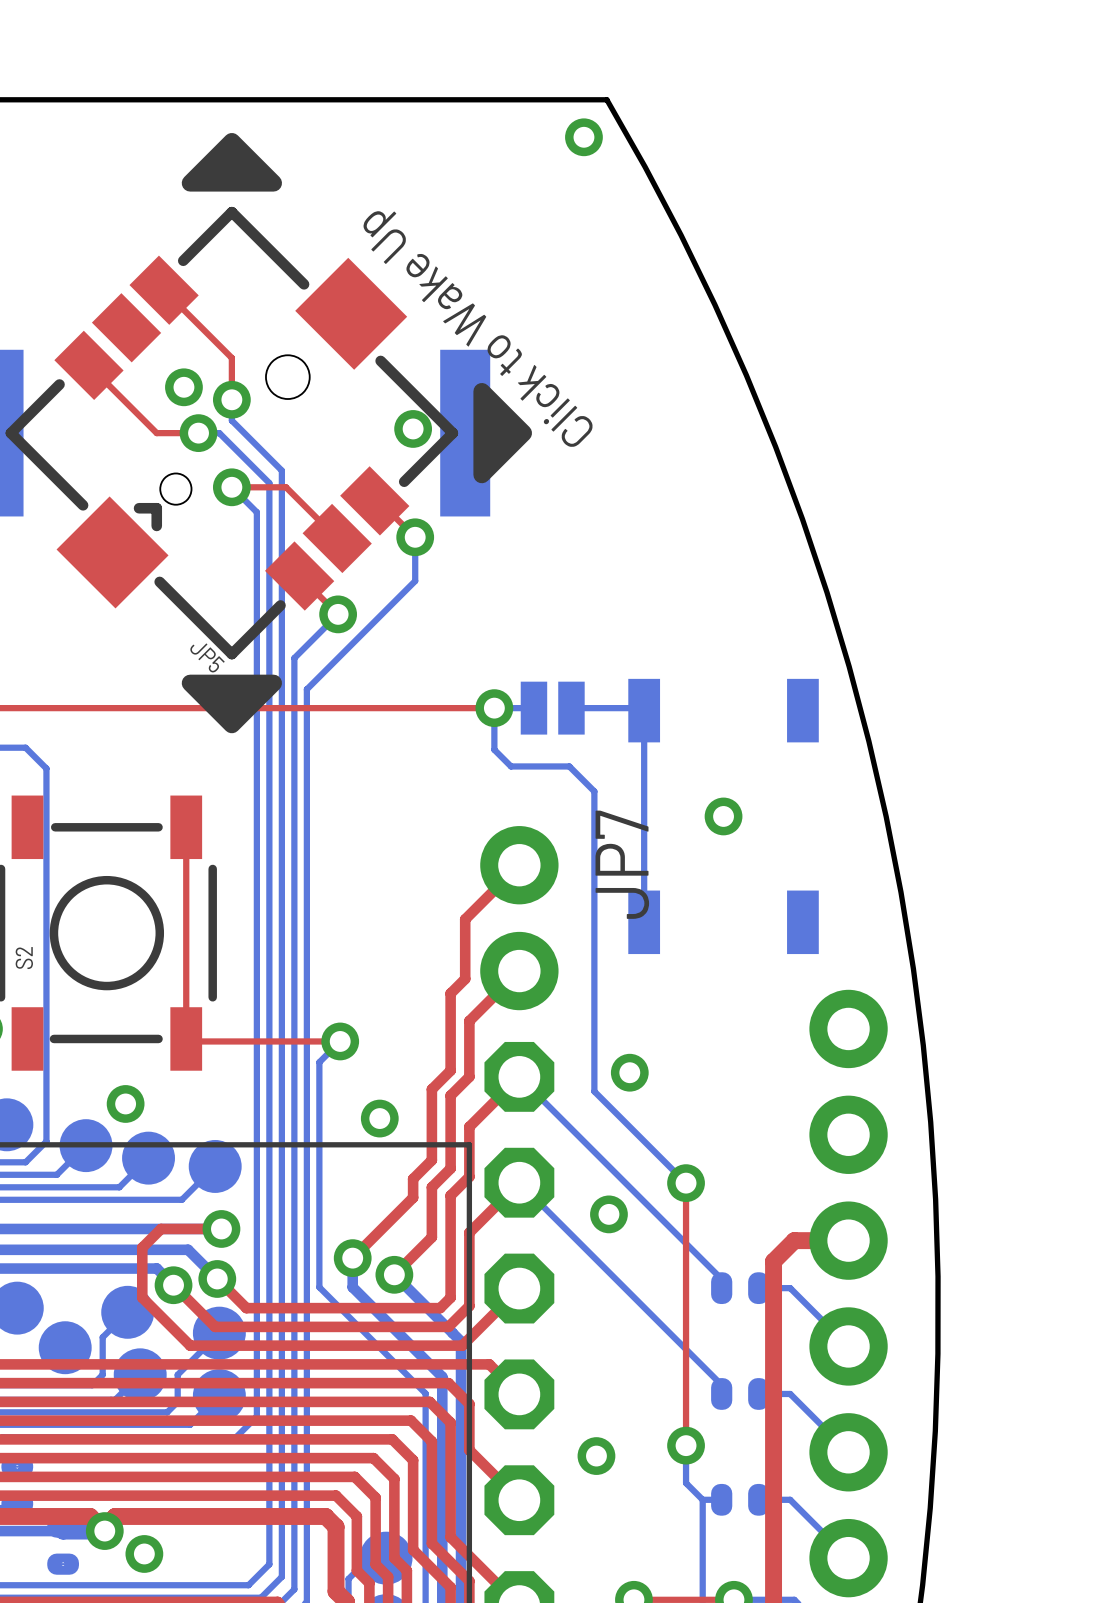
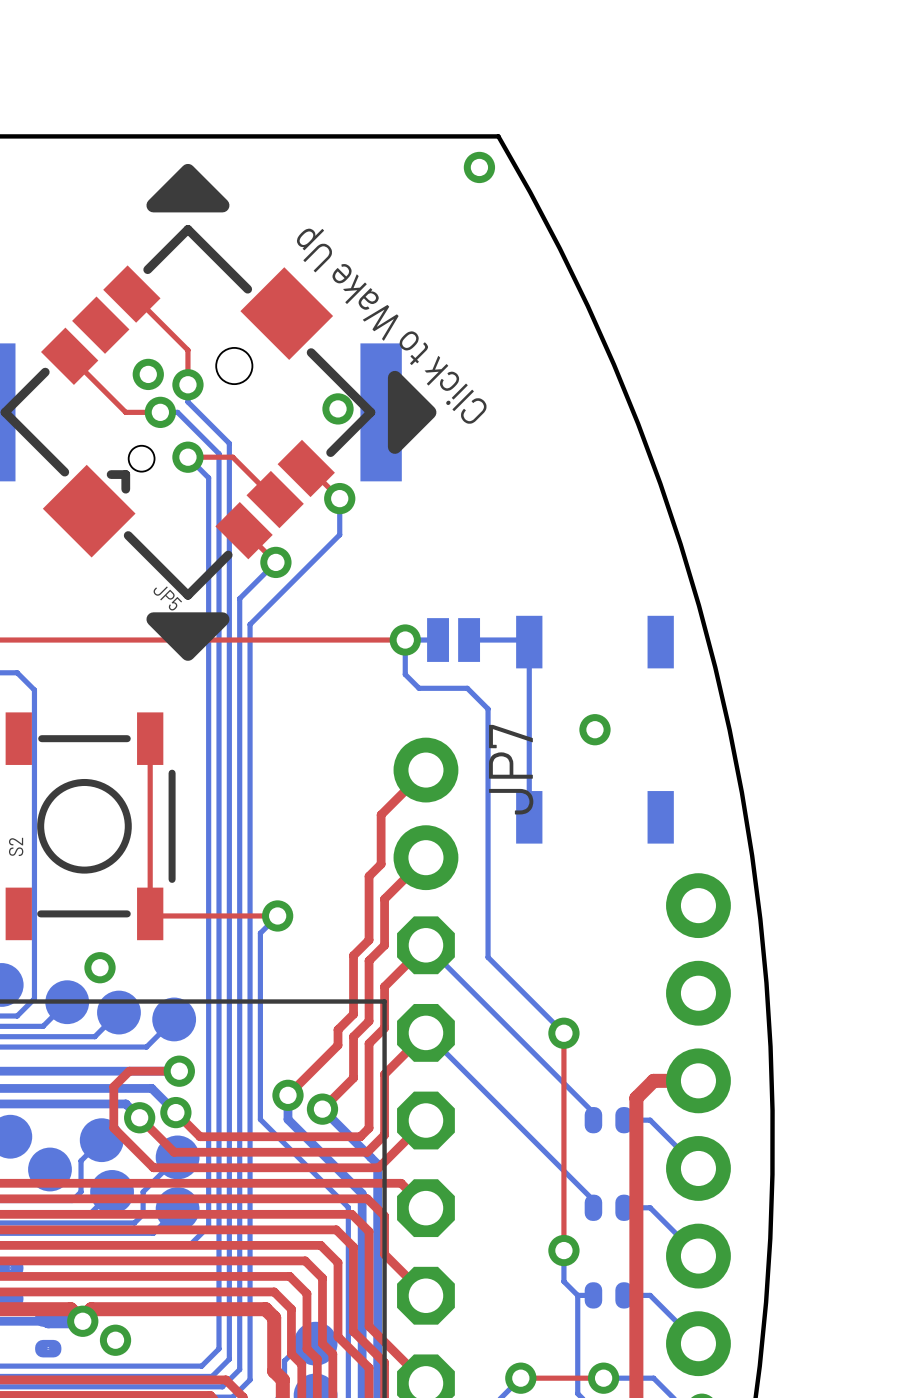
via: (629, 1072) -> none
via: (379, 1118) -> none
via: (608, 1214) -> none
via: (596, 1456) -> none

